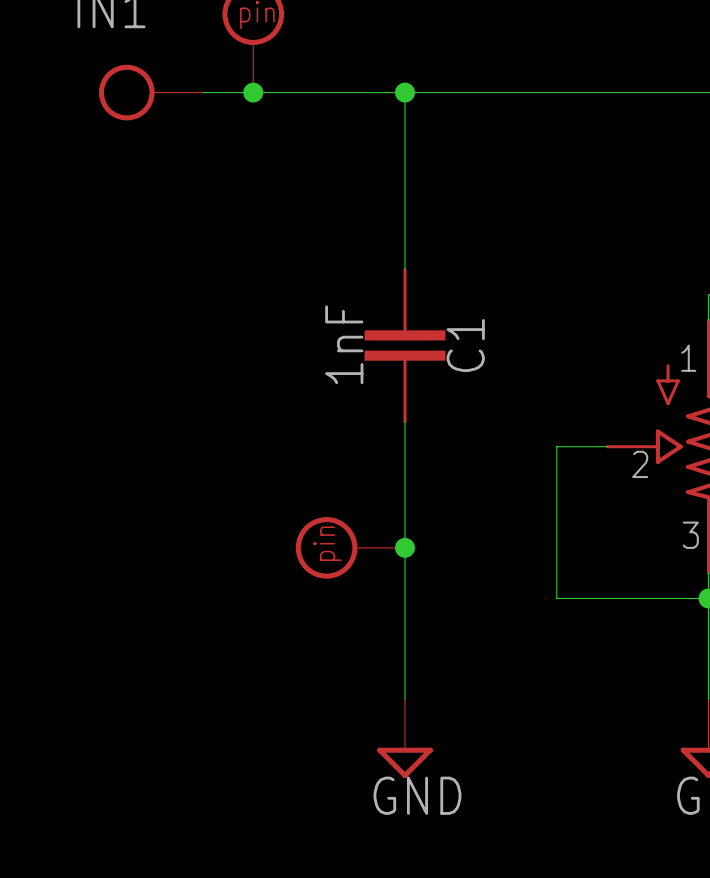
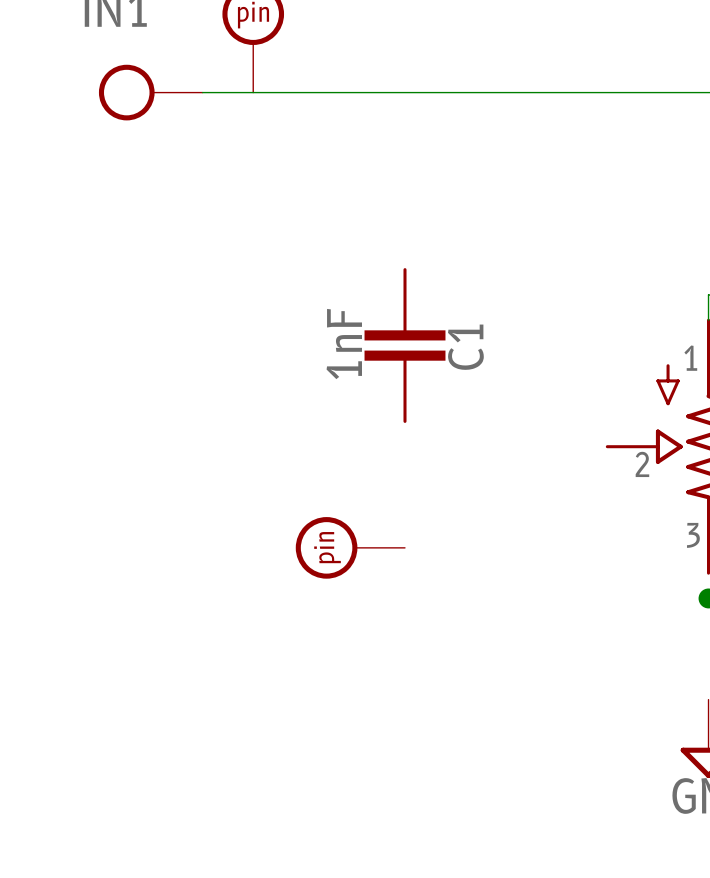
junction: (253, 92) -> none
wire: (405, 92) (405, 269) -> none
junction: (405, 92) -> none
wire: (405, 421) (405, 699) -> none
wire: (607, 446) (556, 446) (556, 598) (708, 598) -> none
junction: (405, 547) -> none
wire: (708, 573) (708, 699) -> none
power symbol: GND (405, 738) -> none

